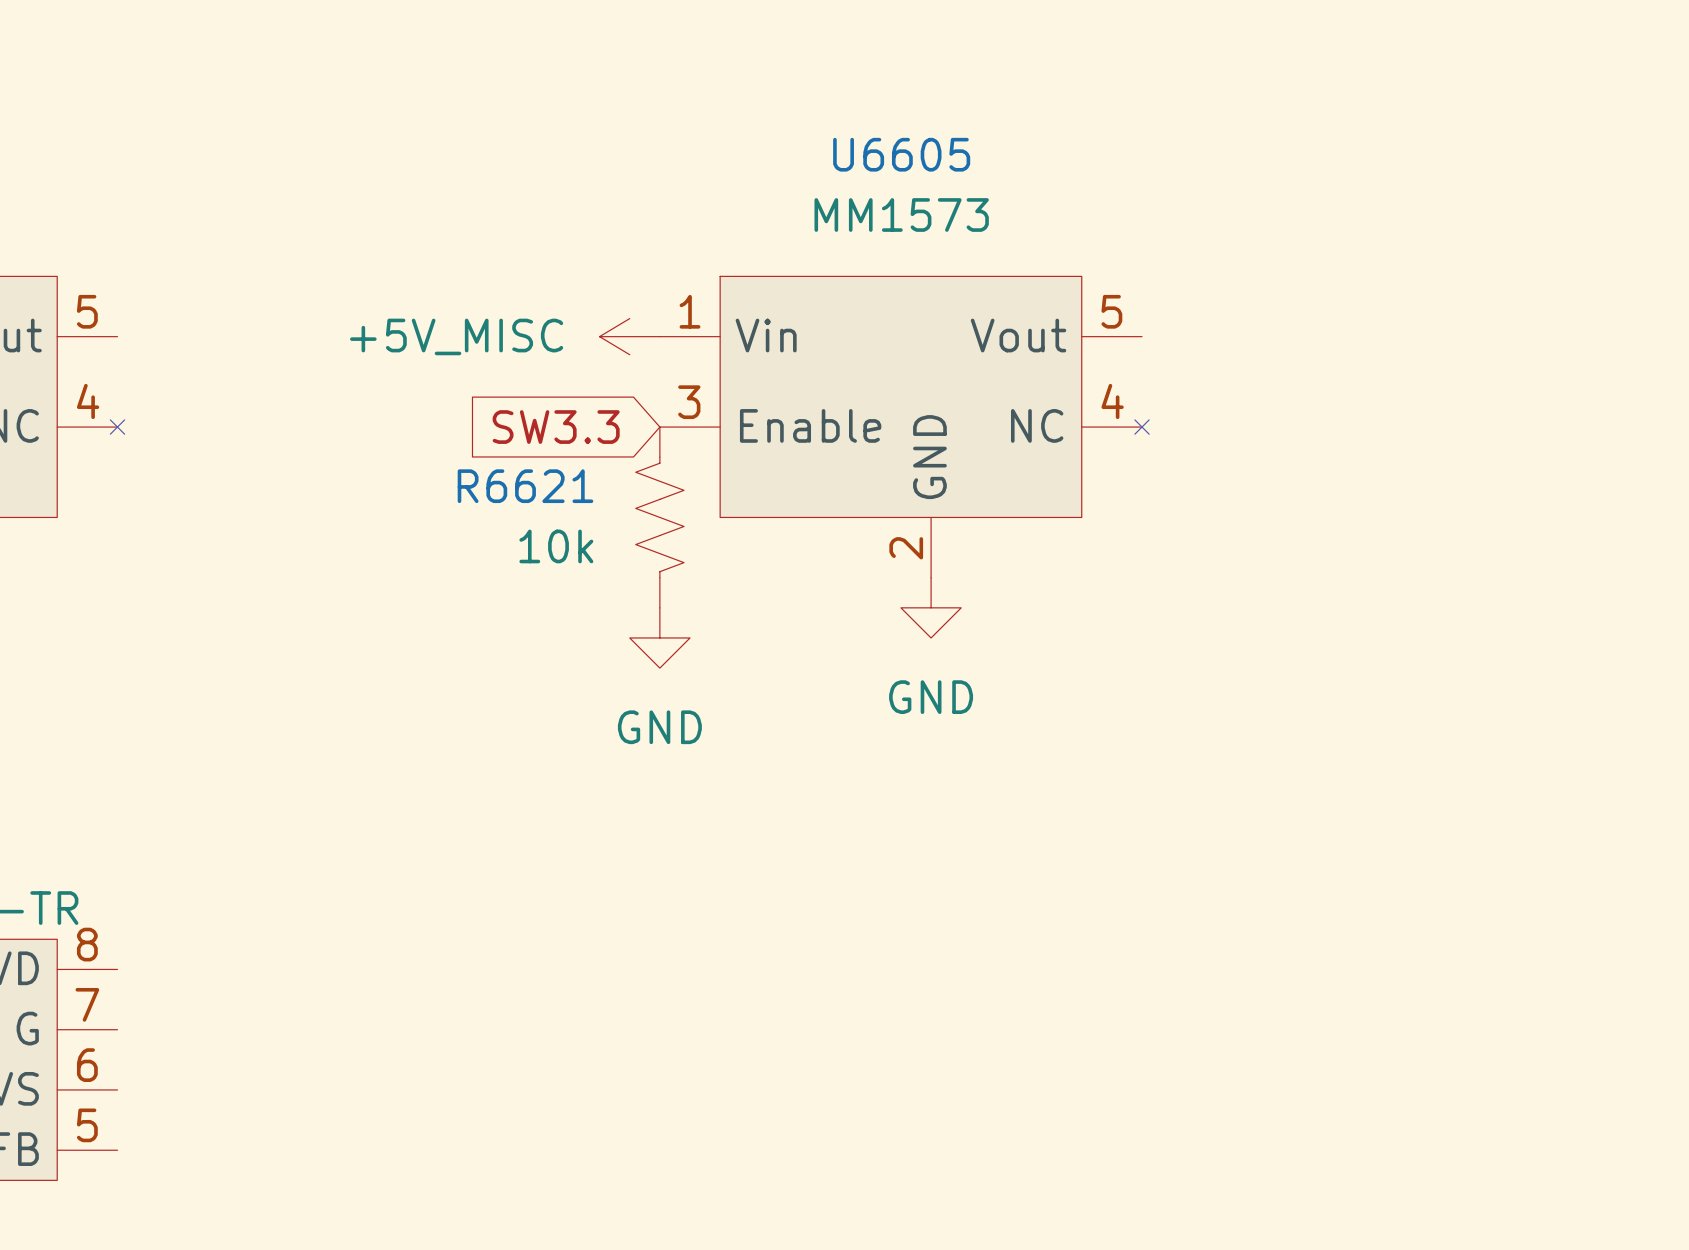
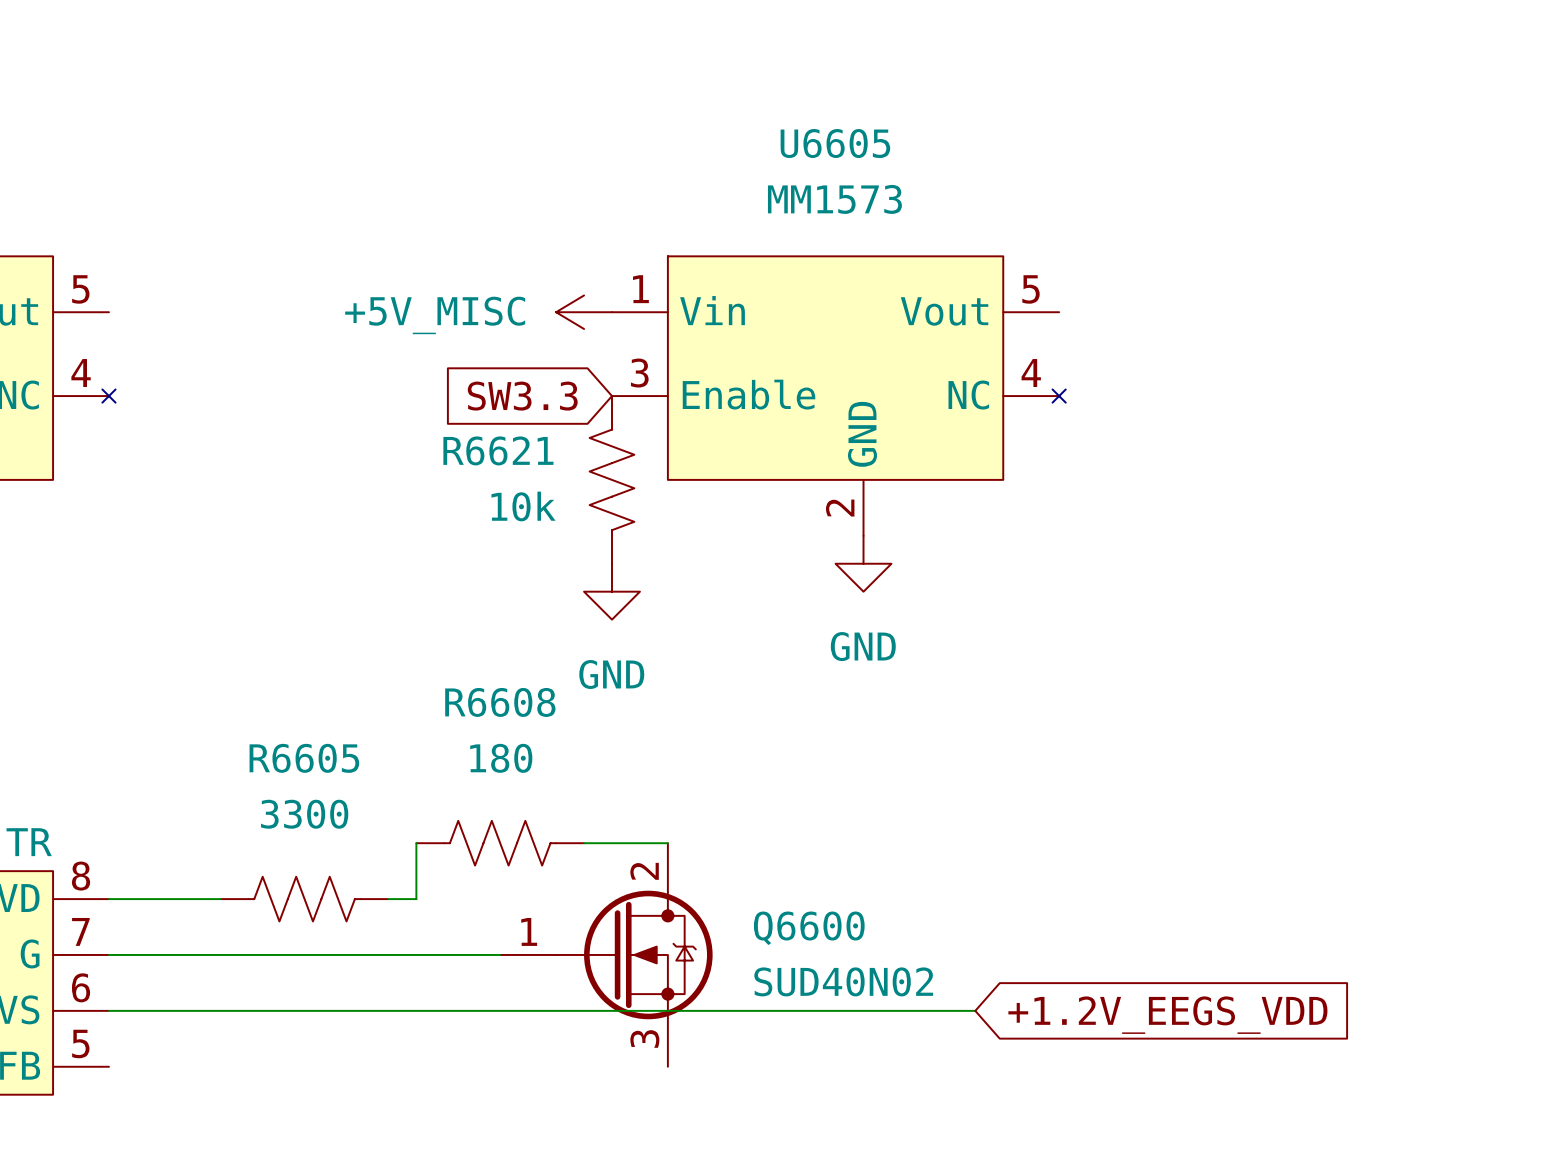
wire: none -> (416, 843) (416, 899) (388, 899)
R6608: none -> 180 (500, 843)
wire: none -> (584, 843) (667, 843)
wire: none -> (108, 899) (220, 899)
R6605: none -> 3300 (304, 899)
wire: none -> (108, 954) (500, 954)
Q6600: none -> SUD40N02 (606, 954)
wire: none -> (108, 1010) (975, 1010)
global label: none -> +1.2V_EEGS_VDD (1167, 1015)

